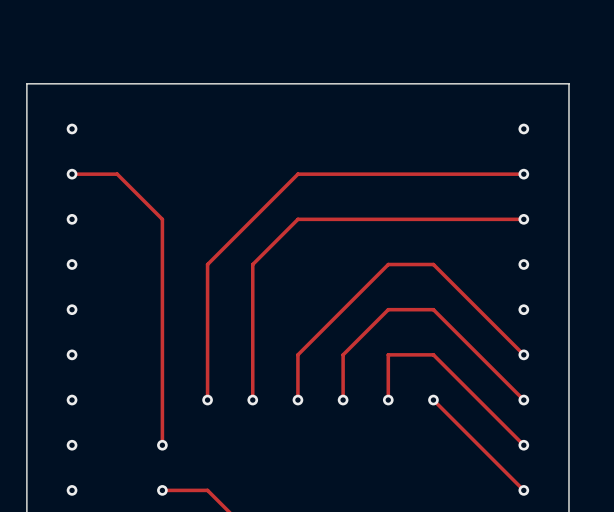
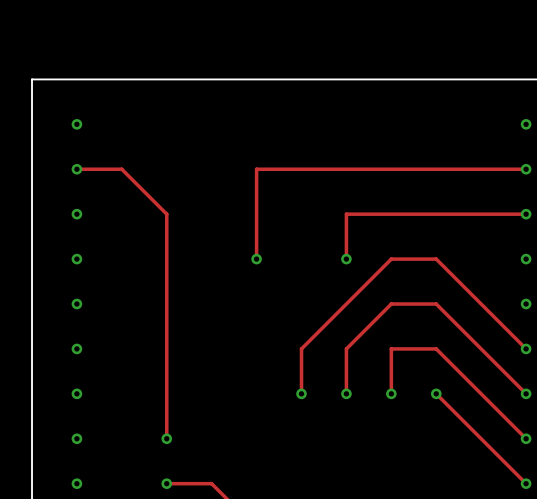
top track: (297, 174) (207, 264) (207, 400) -> (301, 169) (256, 169) (256, 259)
top track: (343, 219) (297, 219) (252, 264) (252, 400) -> (346, 214) (346, 259)
via: none -> (256, 259)
via: none -> (346, 259)
via: (207, 400) -> none
via: (252, 400) -> none

